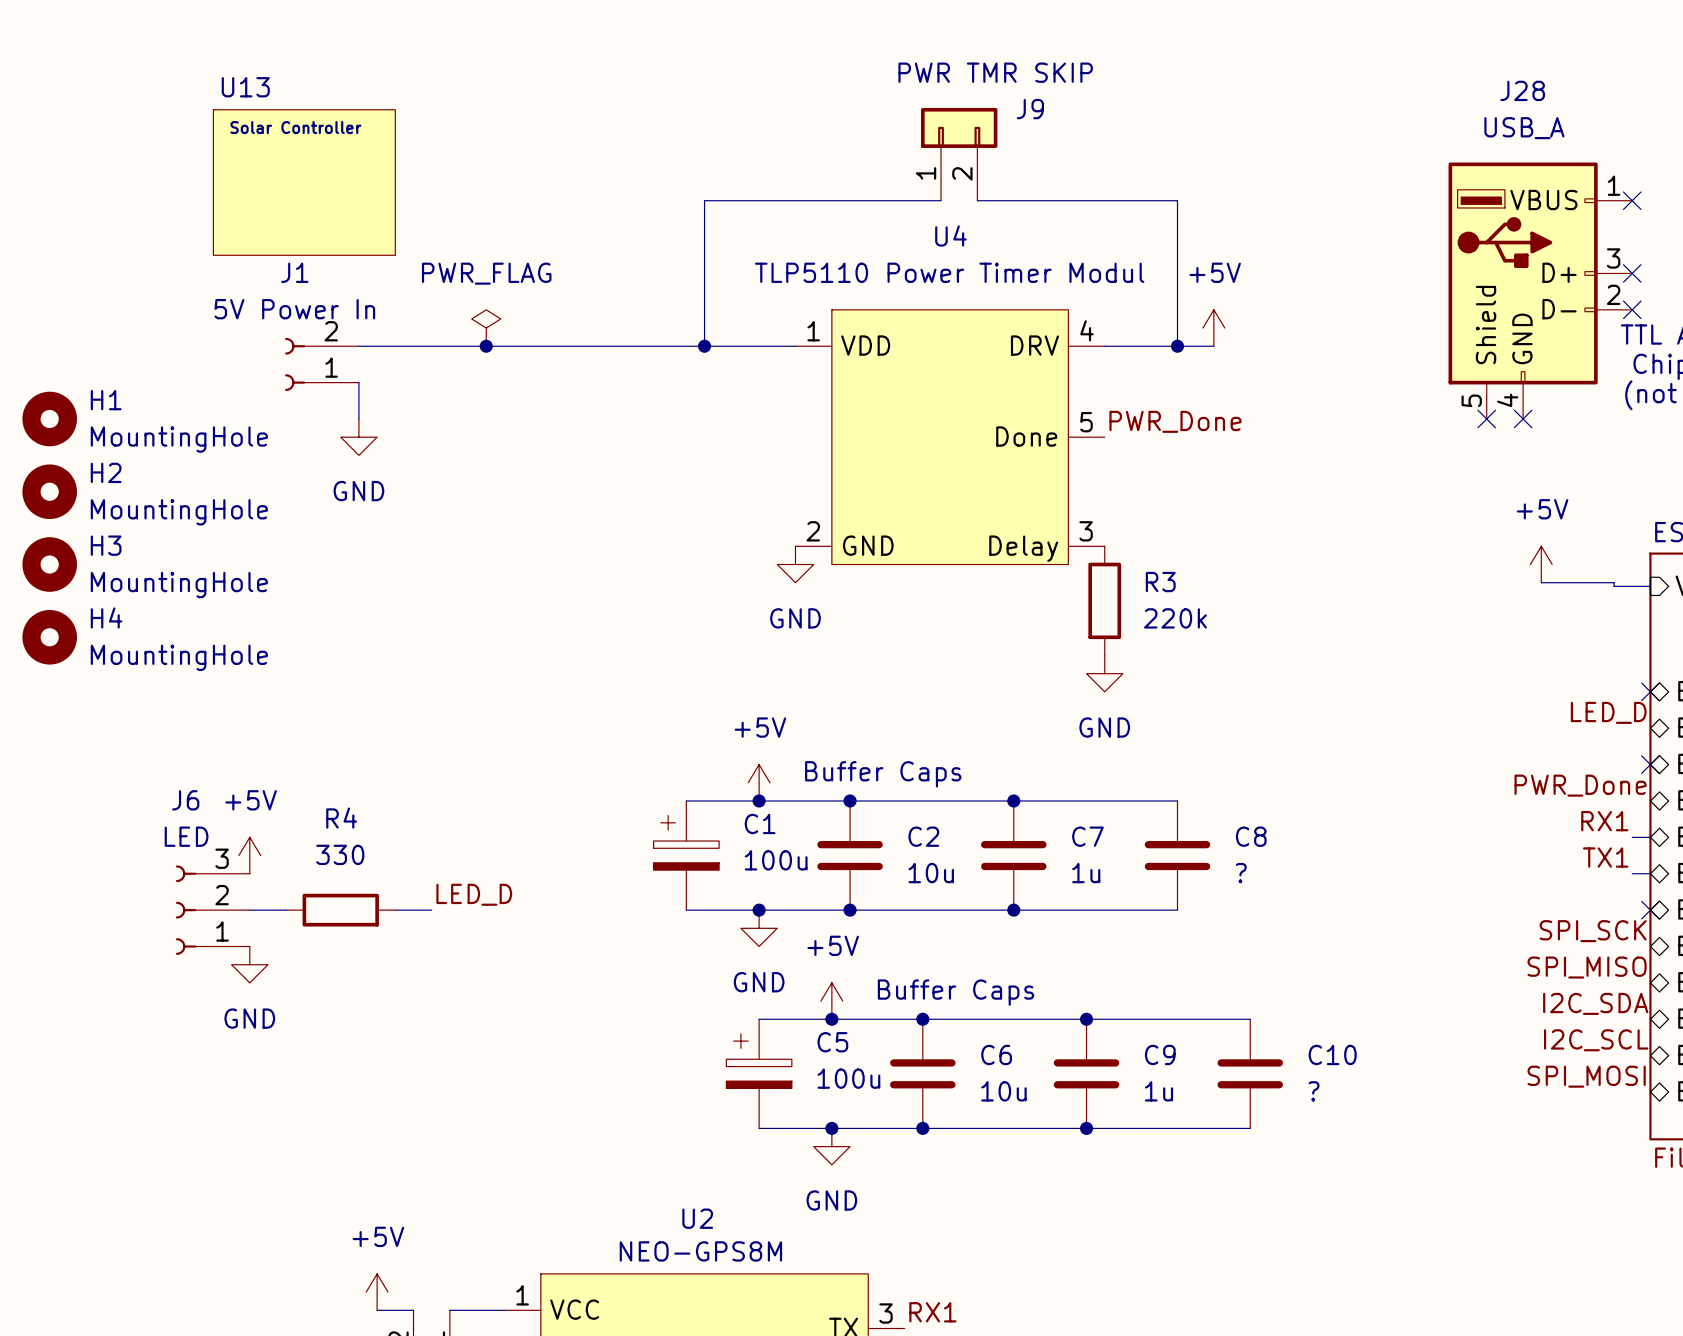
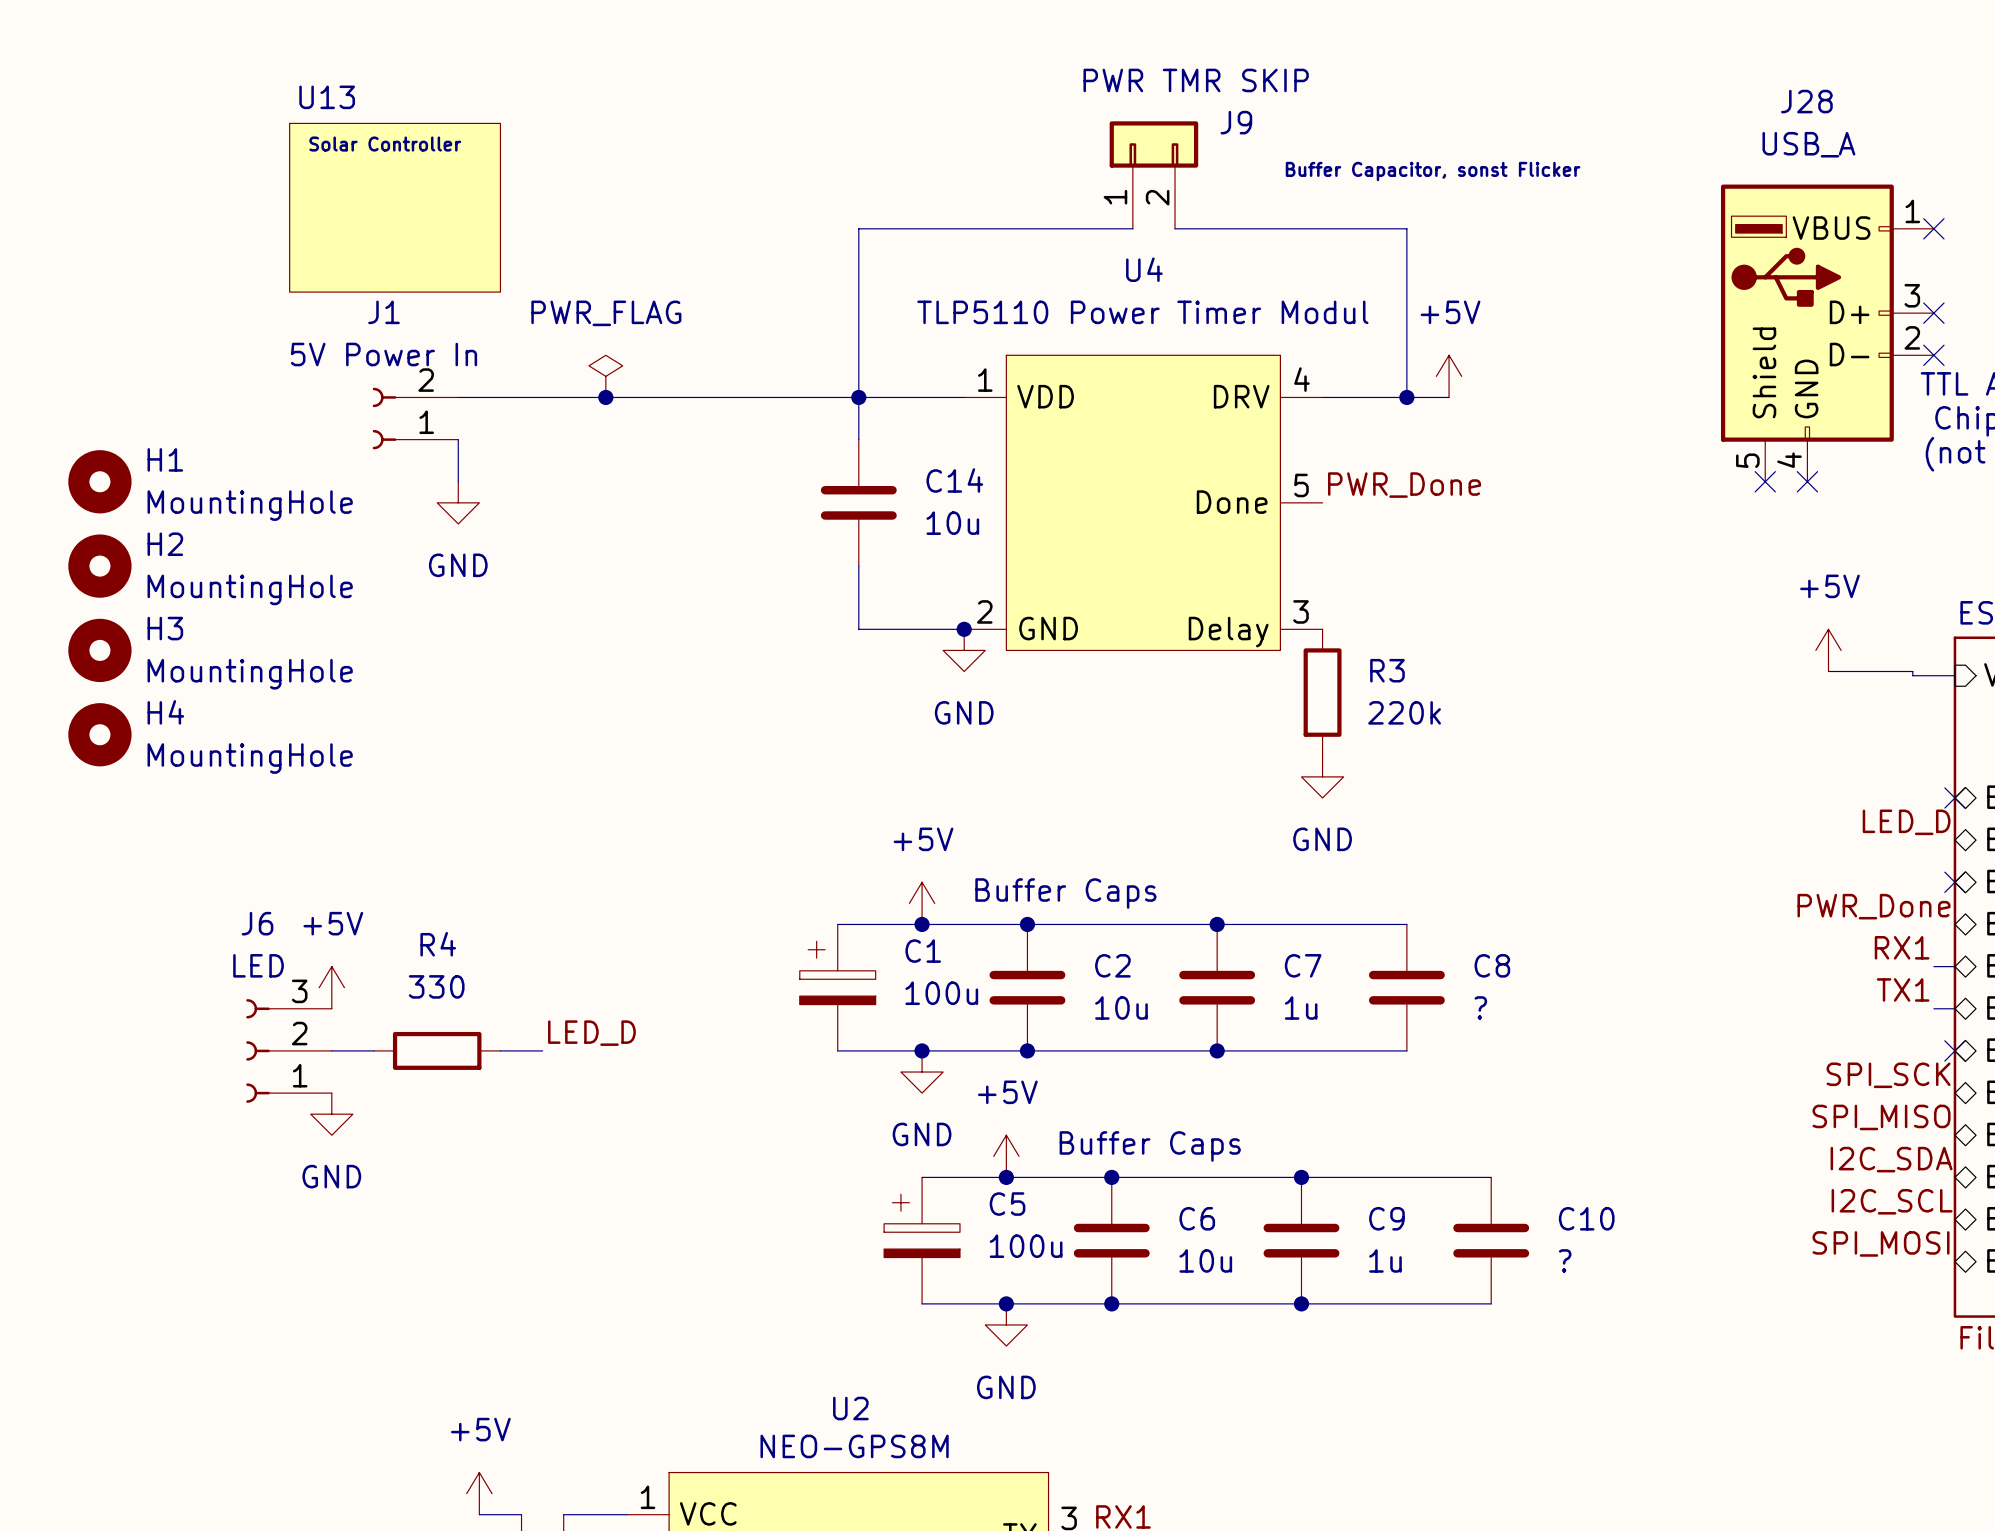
text: none -> Buffer Capacitor, sonst Flicker (1433, 171)
wire: none -> (858, 397) (858, 439)
C14: none -> 10u (858, 502)
wire: none -> (858, 566) (858, 629) (964, 629)
junction: none -> (964, 629)

